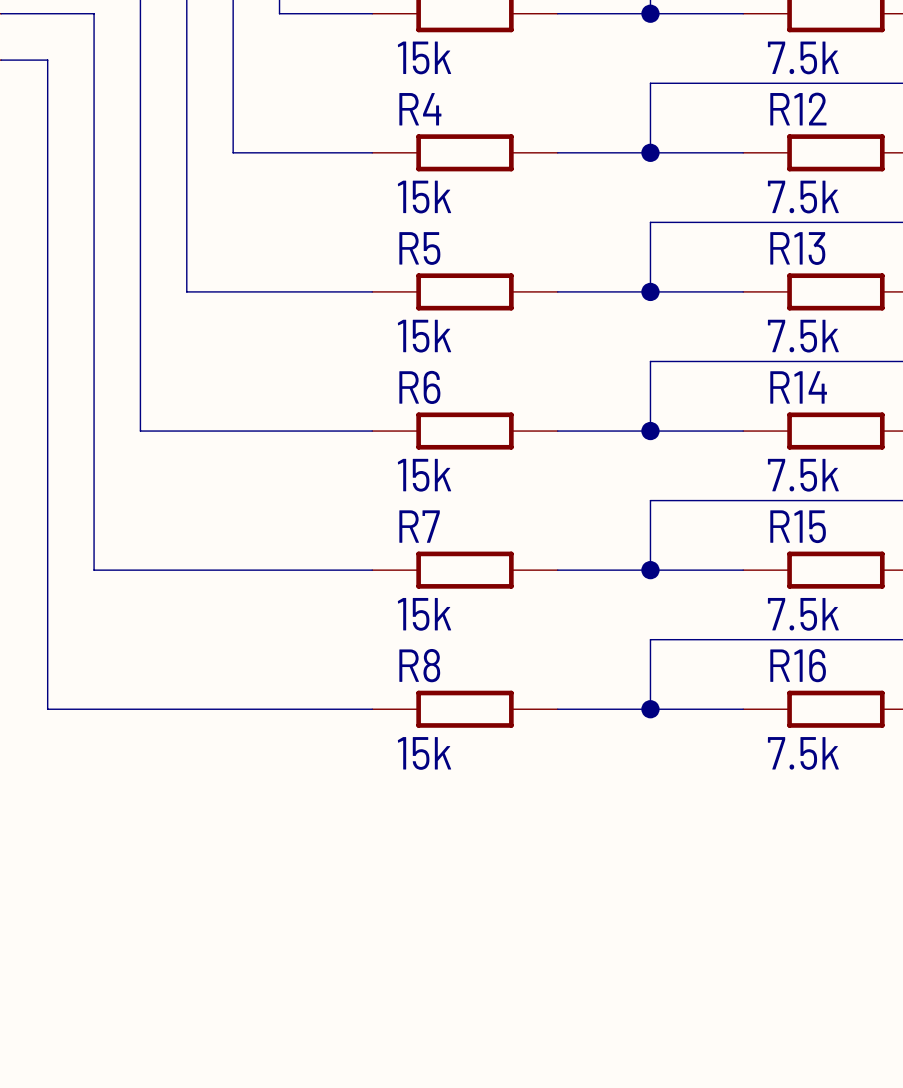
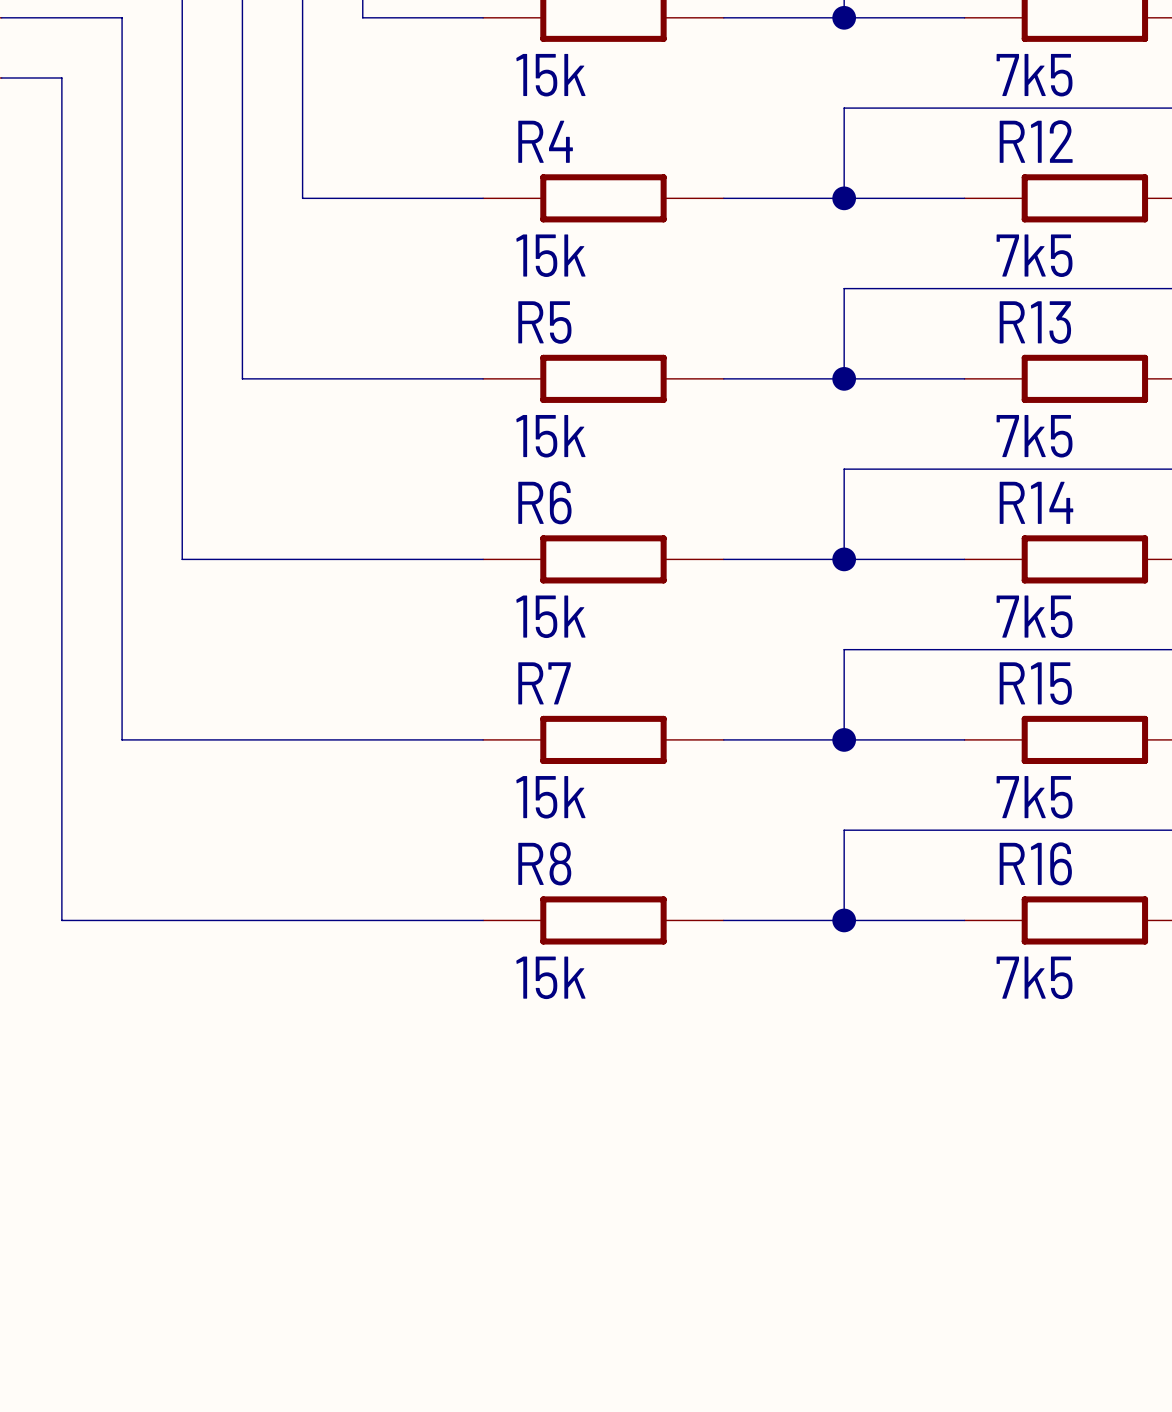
part value: 7.5k (803, 57) -> 7k5 (1034, 75)
R12 value: 7.5k (803, 197) -> 7k5 (1034, 255)
R13 value: 7.5k (803, 336) -> 7k5 (1034, 436)
R14 value: 7.5k (803, 475) -> 7k5 (1034, 616)
R15 value: 7.5k (803, 614) -> 7k5 (1034, 797)
R16 value: 7.5k (803, 753) -> 7k5 (1034, 977)

